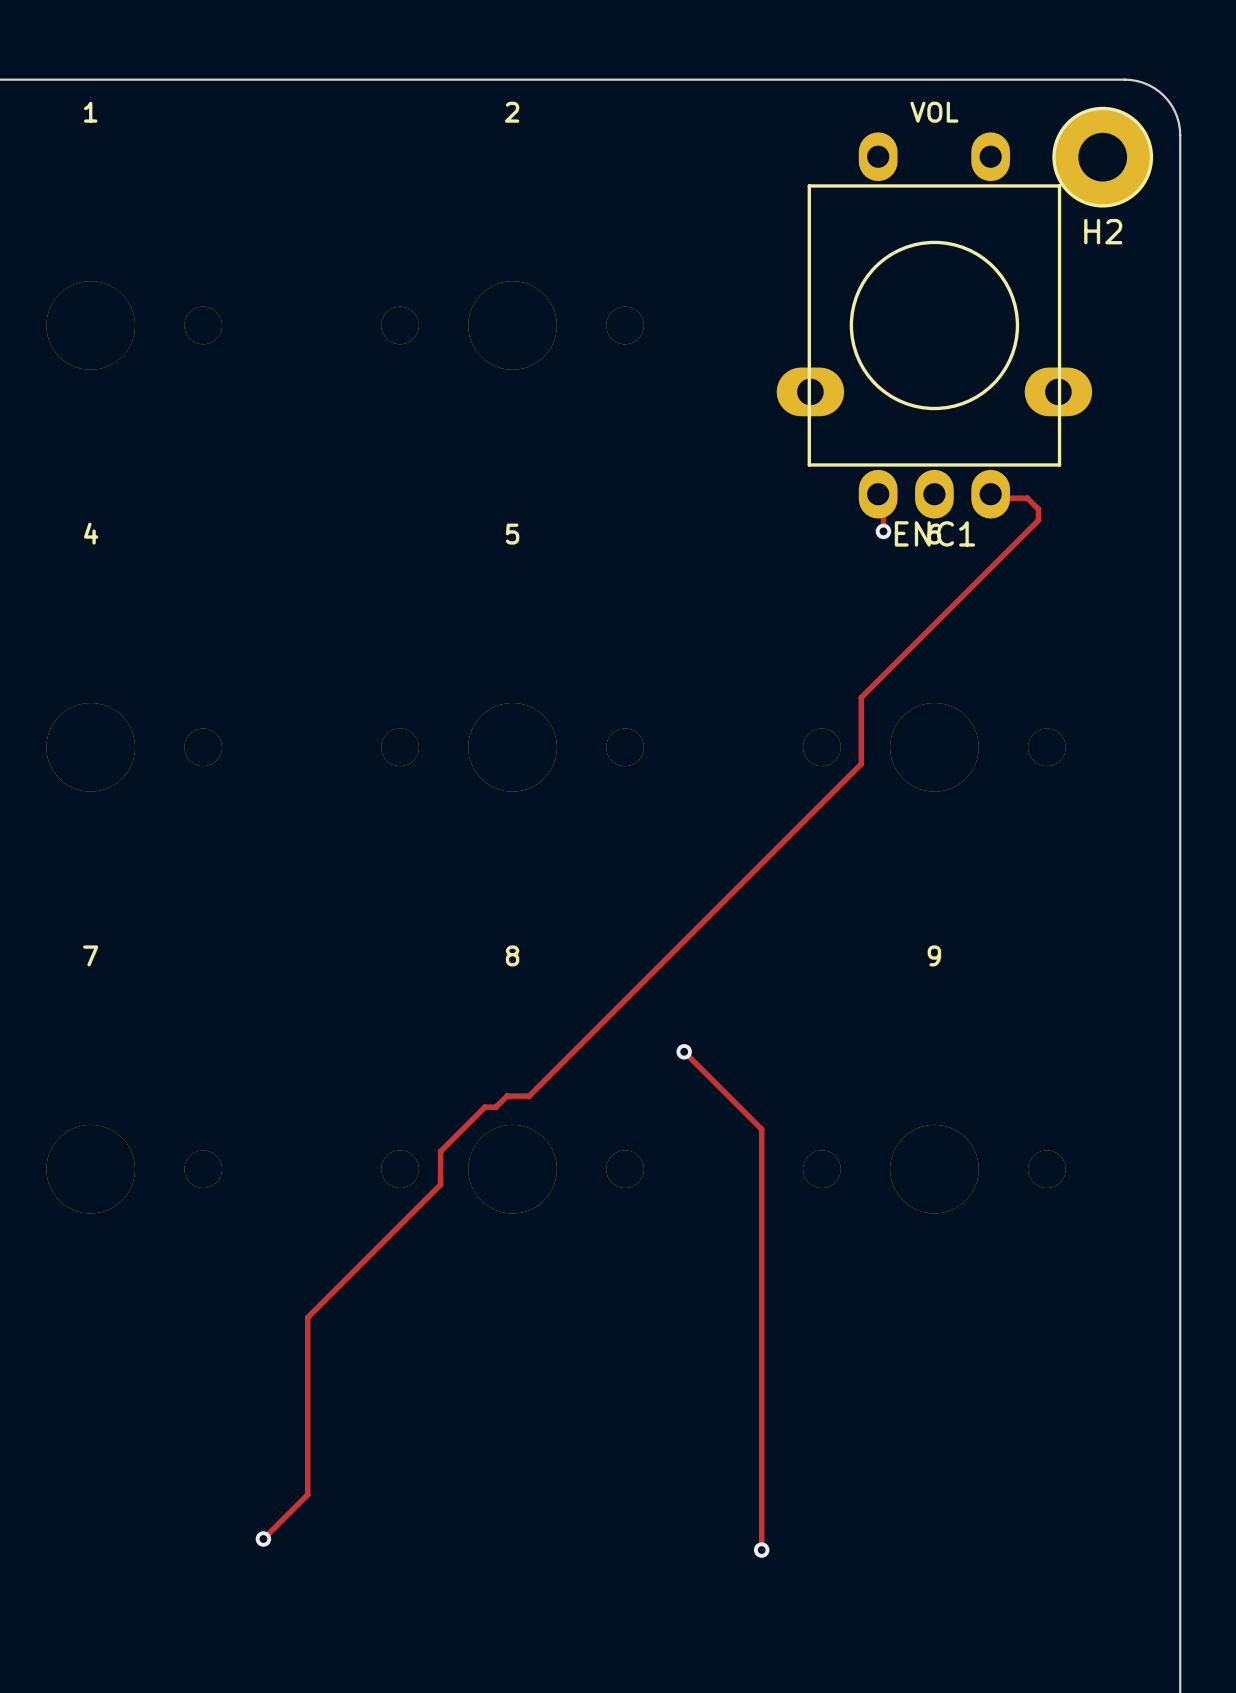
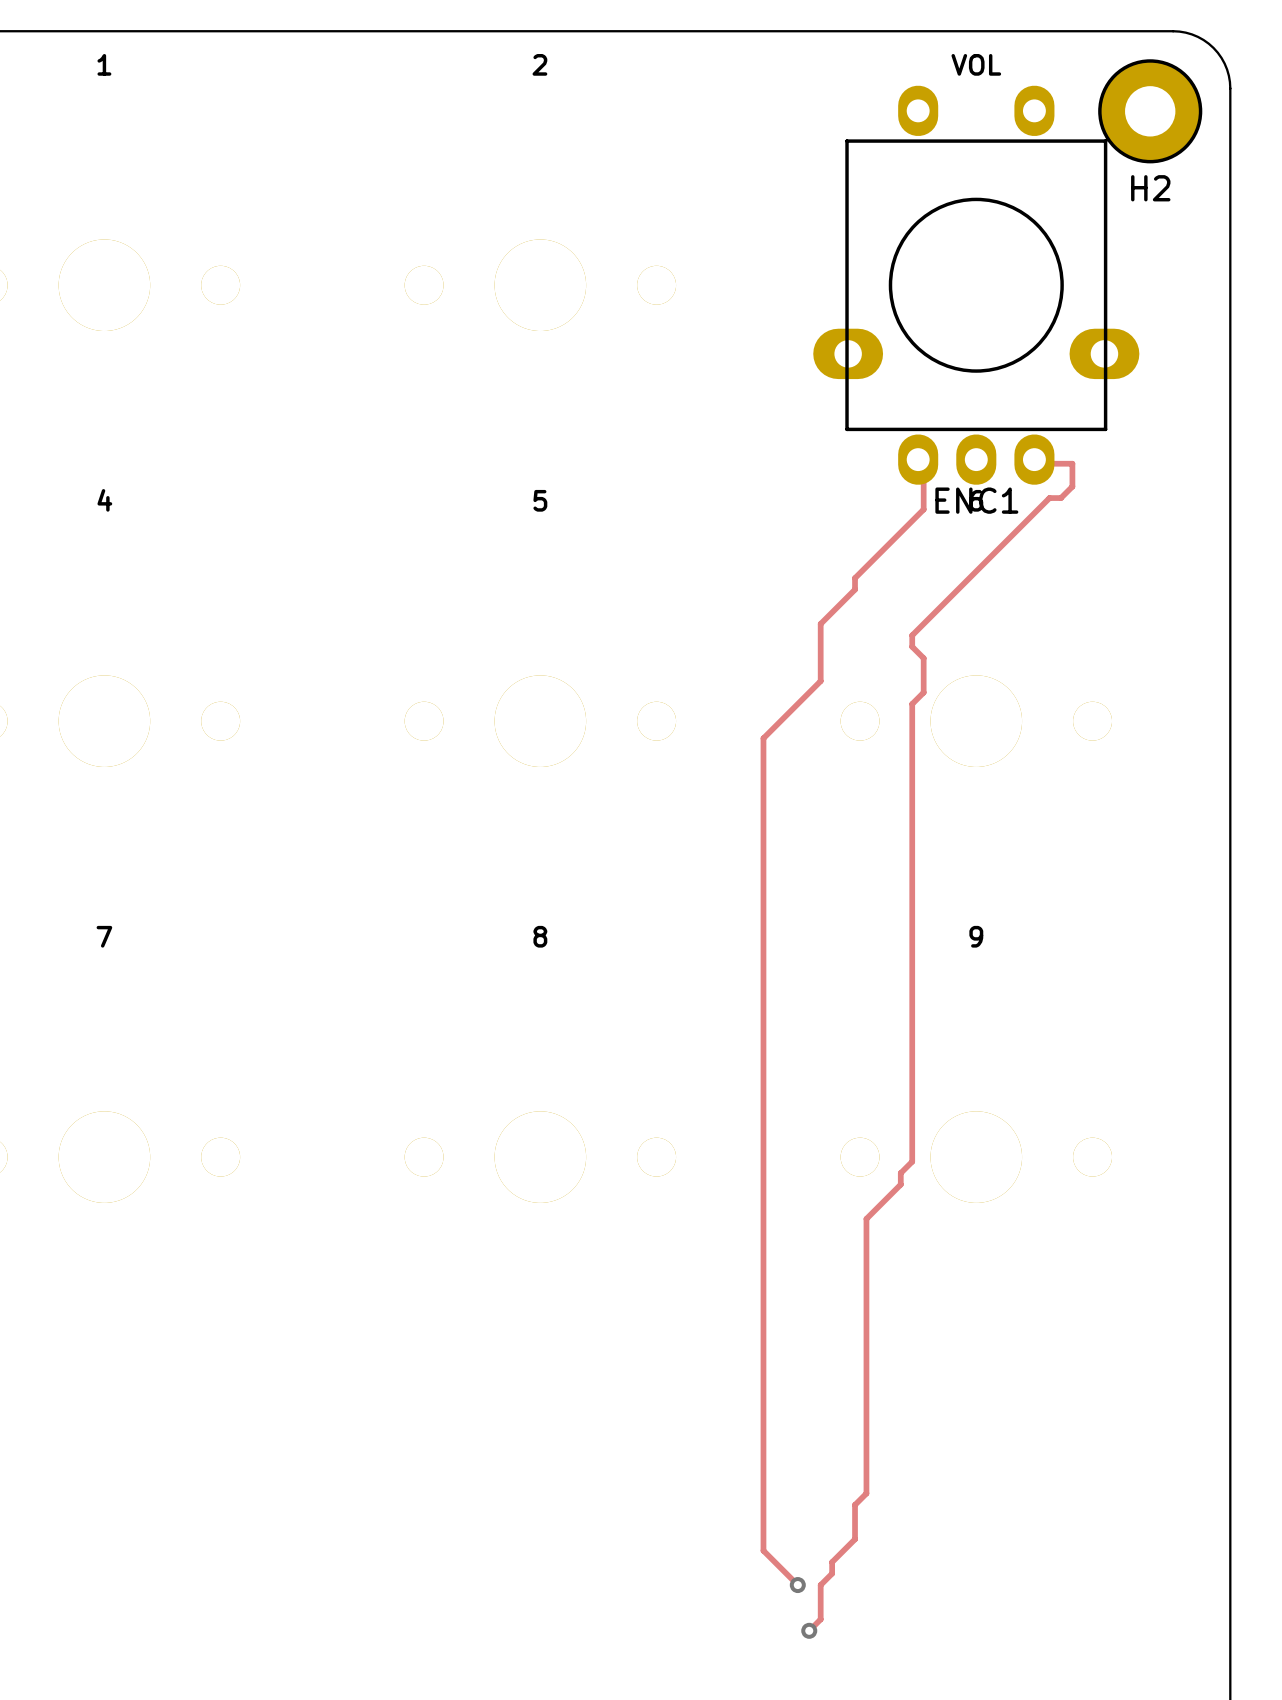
track: (1027, 498) (1038, 509) (1038, 520) (861, 697) (861, 763) (529, 1096) (507, 1096) (495, 1107) (484, 1107) (440, 1151) (440, 1184) (307, 1317) (307, 1494) (263, 1538) -> (1072, 463) (1072, 486) (1060, 498) (1049, 498) (912, 635) (912, 646) (923, 658) (923, 692) (912, 704) (912, 1161) (900, 1173) (900, 1184) (866, 1218) (866, 1493) (855, 1504) (855, 1539) (832, 1562) (832, 1573) (820, 1585) (820, 1619) (809, 1630)
track: none -> (923, 498) (923, 509) (855, 578) (855, 589) (820, 623) (820, 681) (763, 738) (763, 1550) (797, 1585)
via: (883, 531) -> none
track: (684, 1051) (761, 1129) (761, 1550) -> none
via: (684, 1051) -> none
via: (263, 1538) -> none
via position: (761, 1550) -> (797, 1585)
via: none -> (809, 1630)

